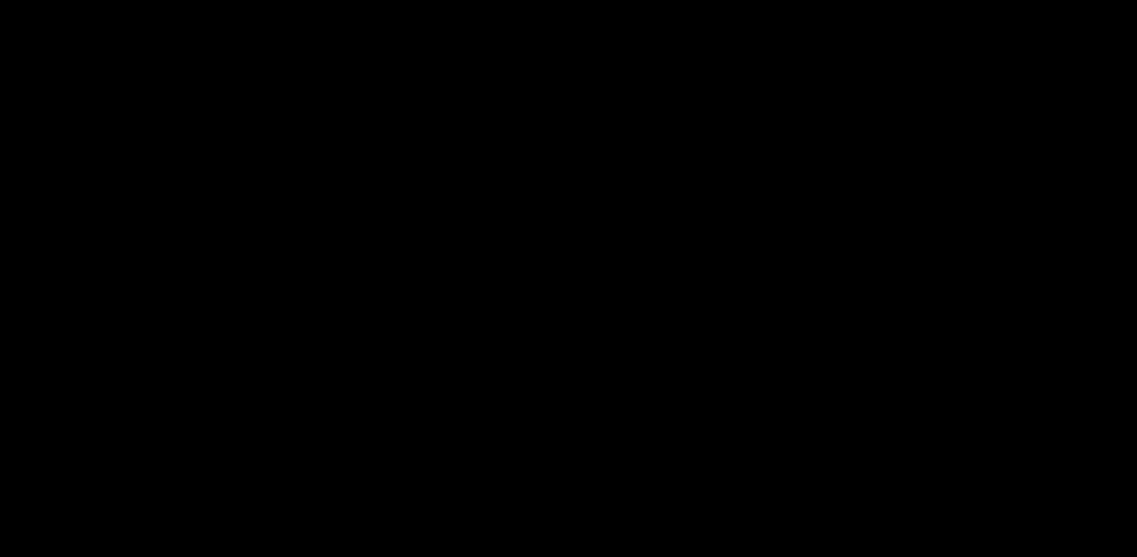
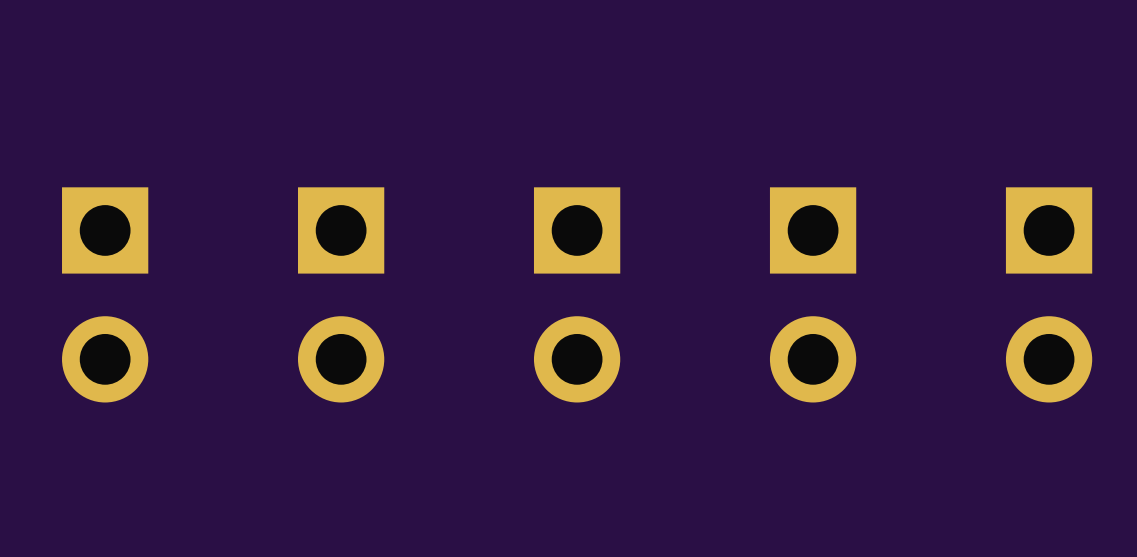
part: none -> (105, 294)
part: none -> (341, 294)
part: none -> (577, 294)
part: none -> (813, 294)
part: none -> (1049, 294)

